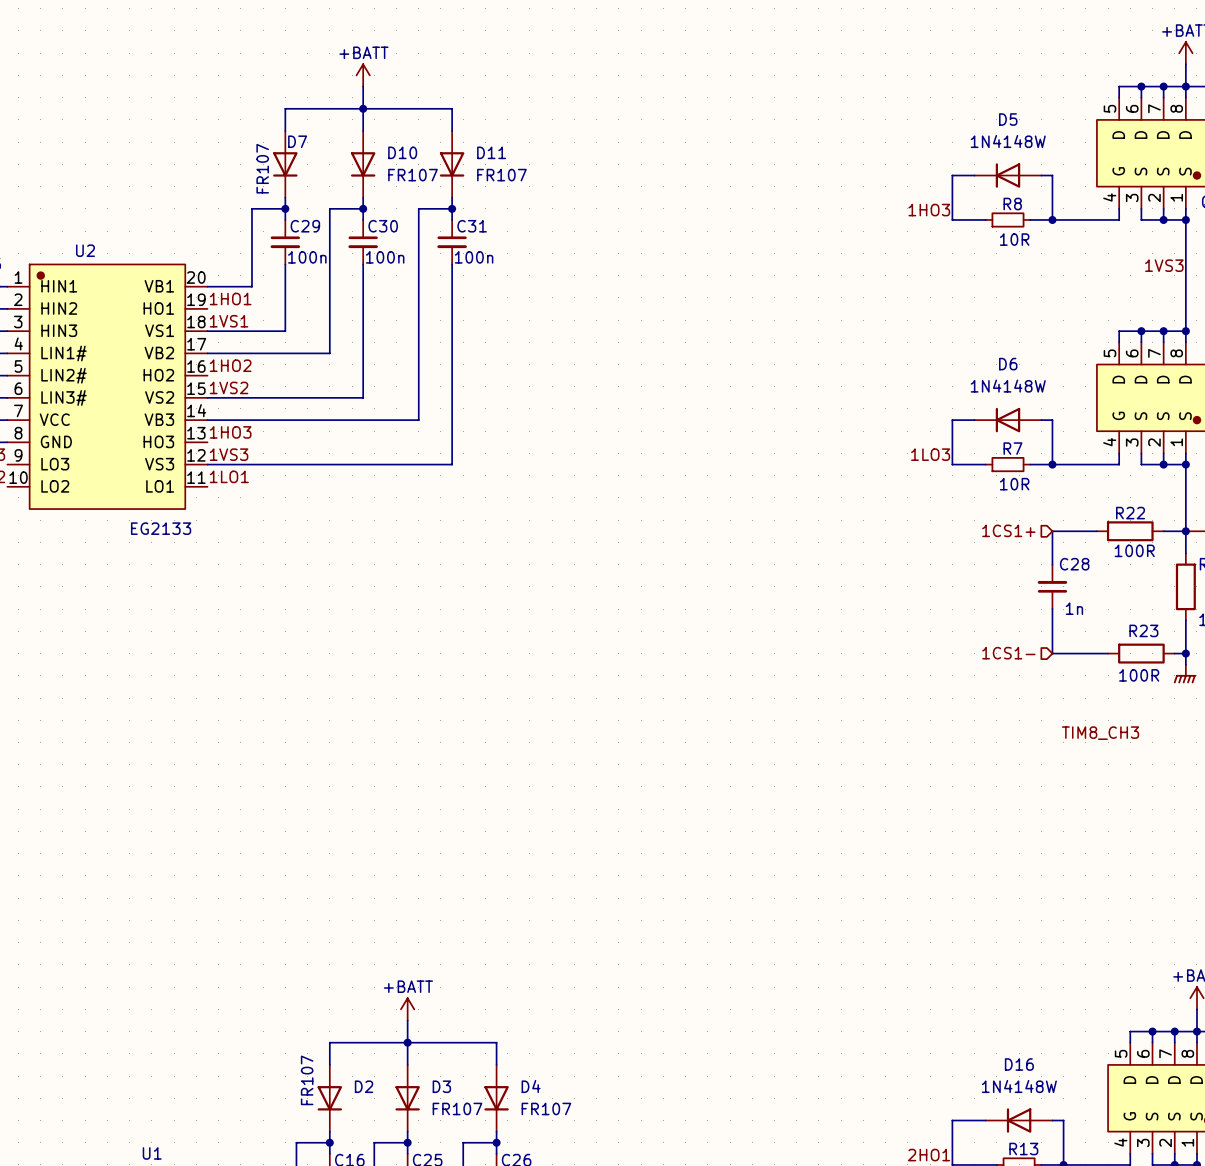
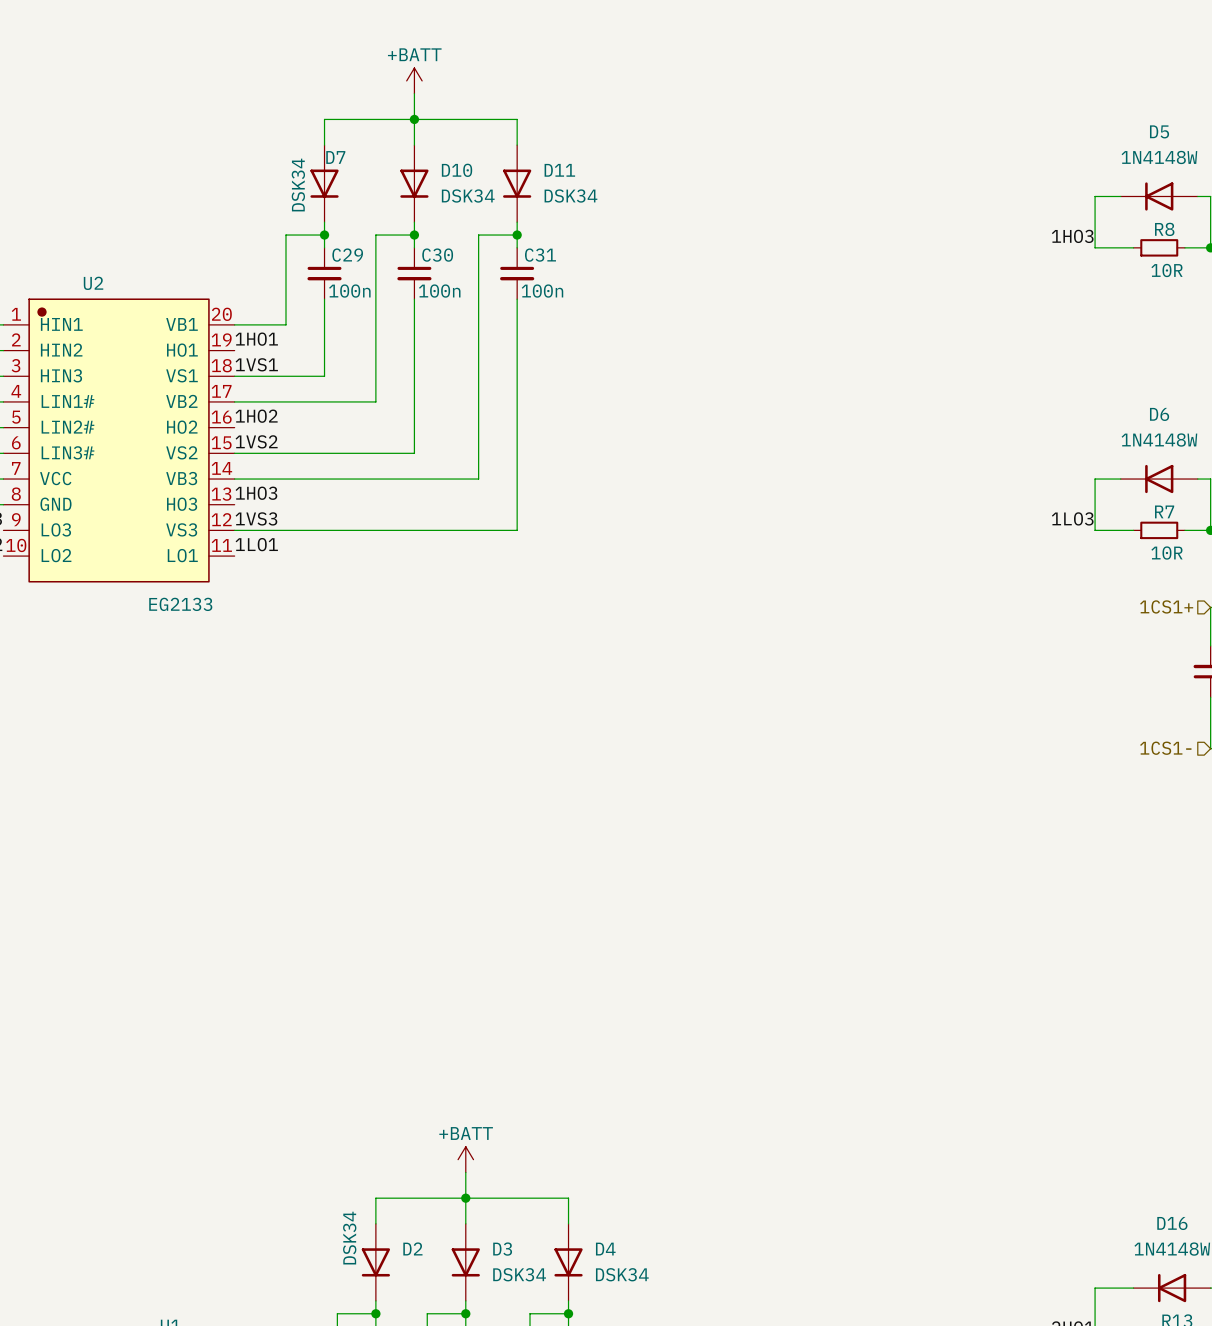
D7 value: FR107 (262, 168) -> DSK34 (298, 185)
D10 value: FR107 (413, 175) -> DSK34 (468, 196)
D11 value: FR107 (501, 175) -> DSK34 (570, 196)
D2 value: FR107 (307, 1080) -> DSK34 (349, 1238)
D3 value: FR107 (457, 1108) -> DSK34 (519, 1274)
D4 value: FR107 (546, 1108) -> DSK34 (622, 1274)

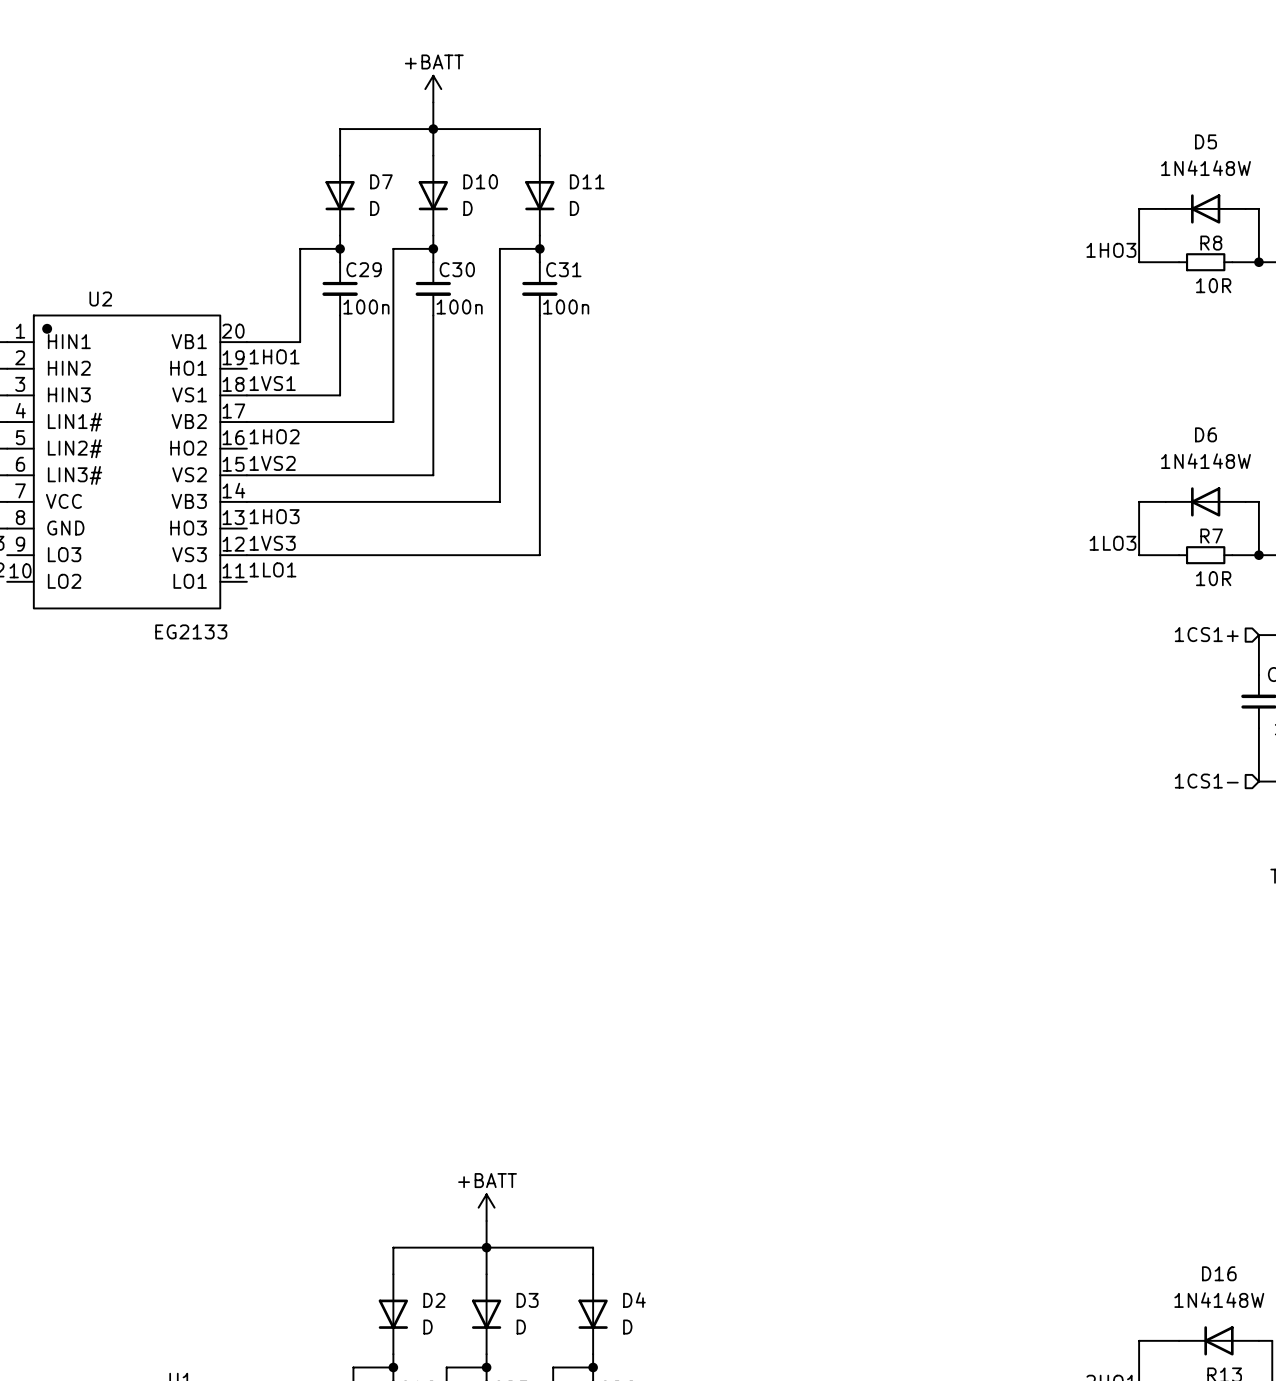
D7 name position: D7 (335, 157) -> D7 (381, 181)
D7 value: DSK34 (298, 185) -> D (374, 208)
D10 value: DSK34 (468, 196) -> D (467, 208)
D11 value: DSK34 (570, 196) -> D (574, 208)
D2 value: DSK34 (349, 1238) -> D (428, 1327)
D3 value: DSK34 (519, 1274) -> D (521, 1327)
D4 value: DSK34 (622, 1274) -> D (627, 1327)

